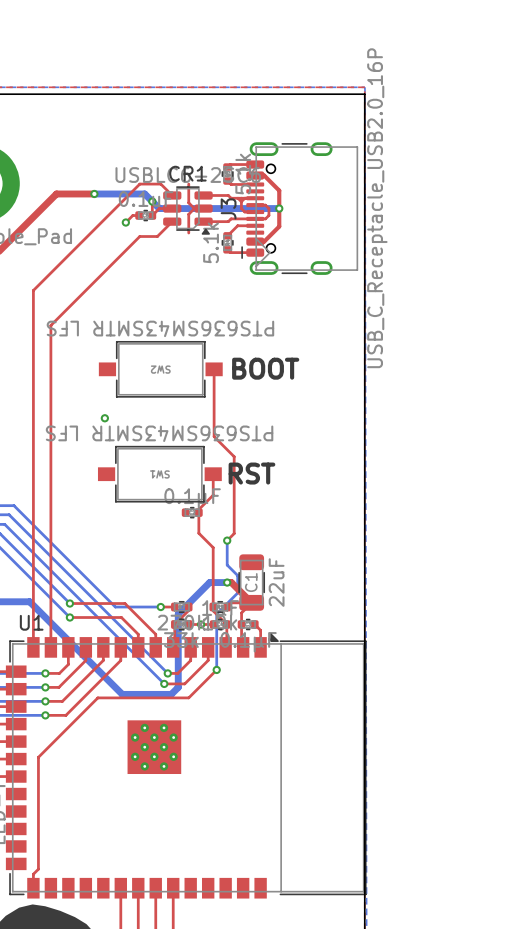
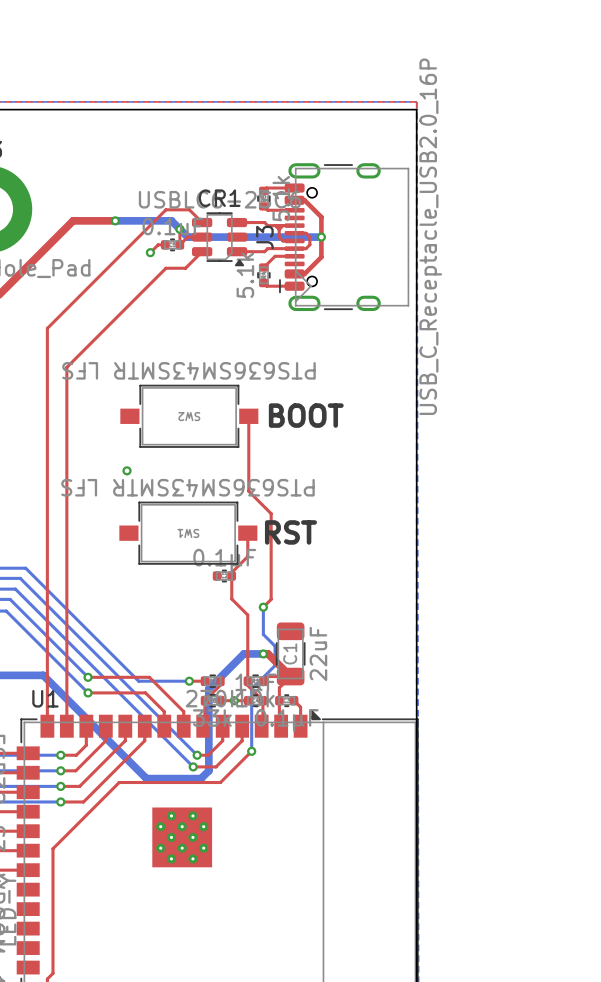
top track: (188, 184) (188, 202) (194, 208) -> none
top track: (194, 208) (188, 214) (188, 233) -> none

